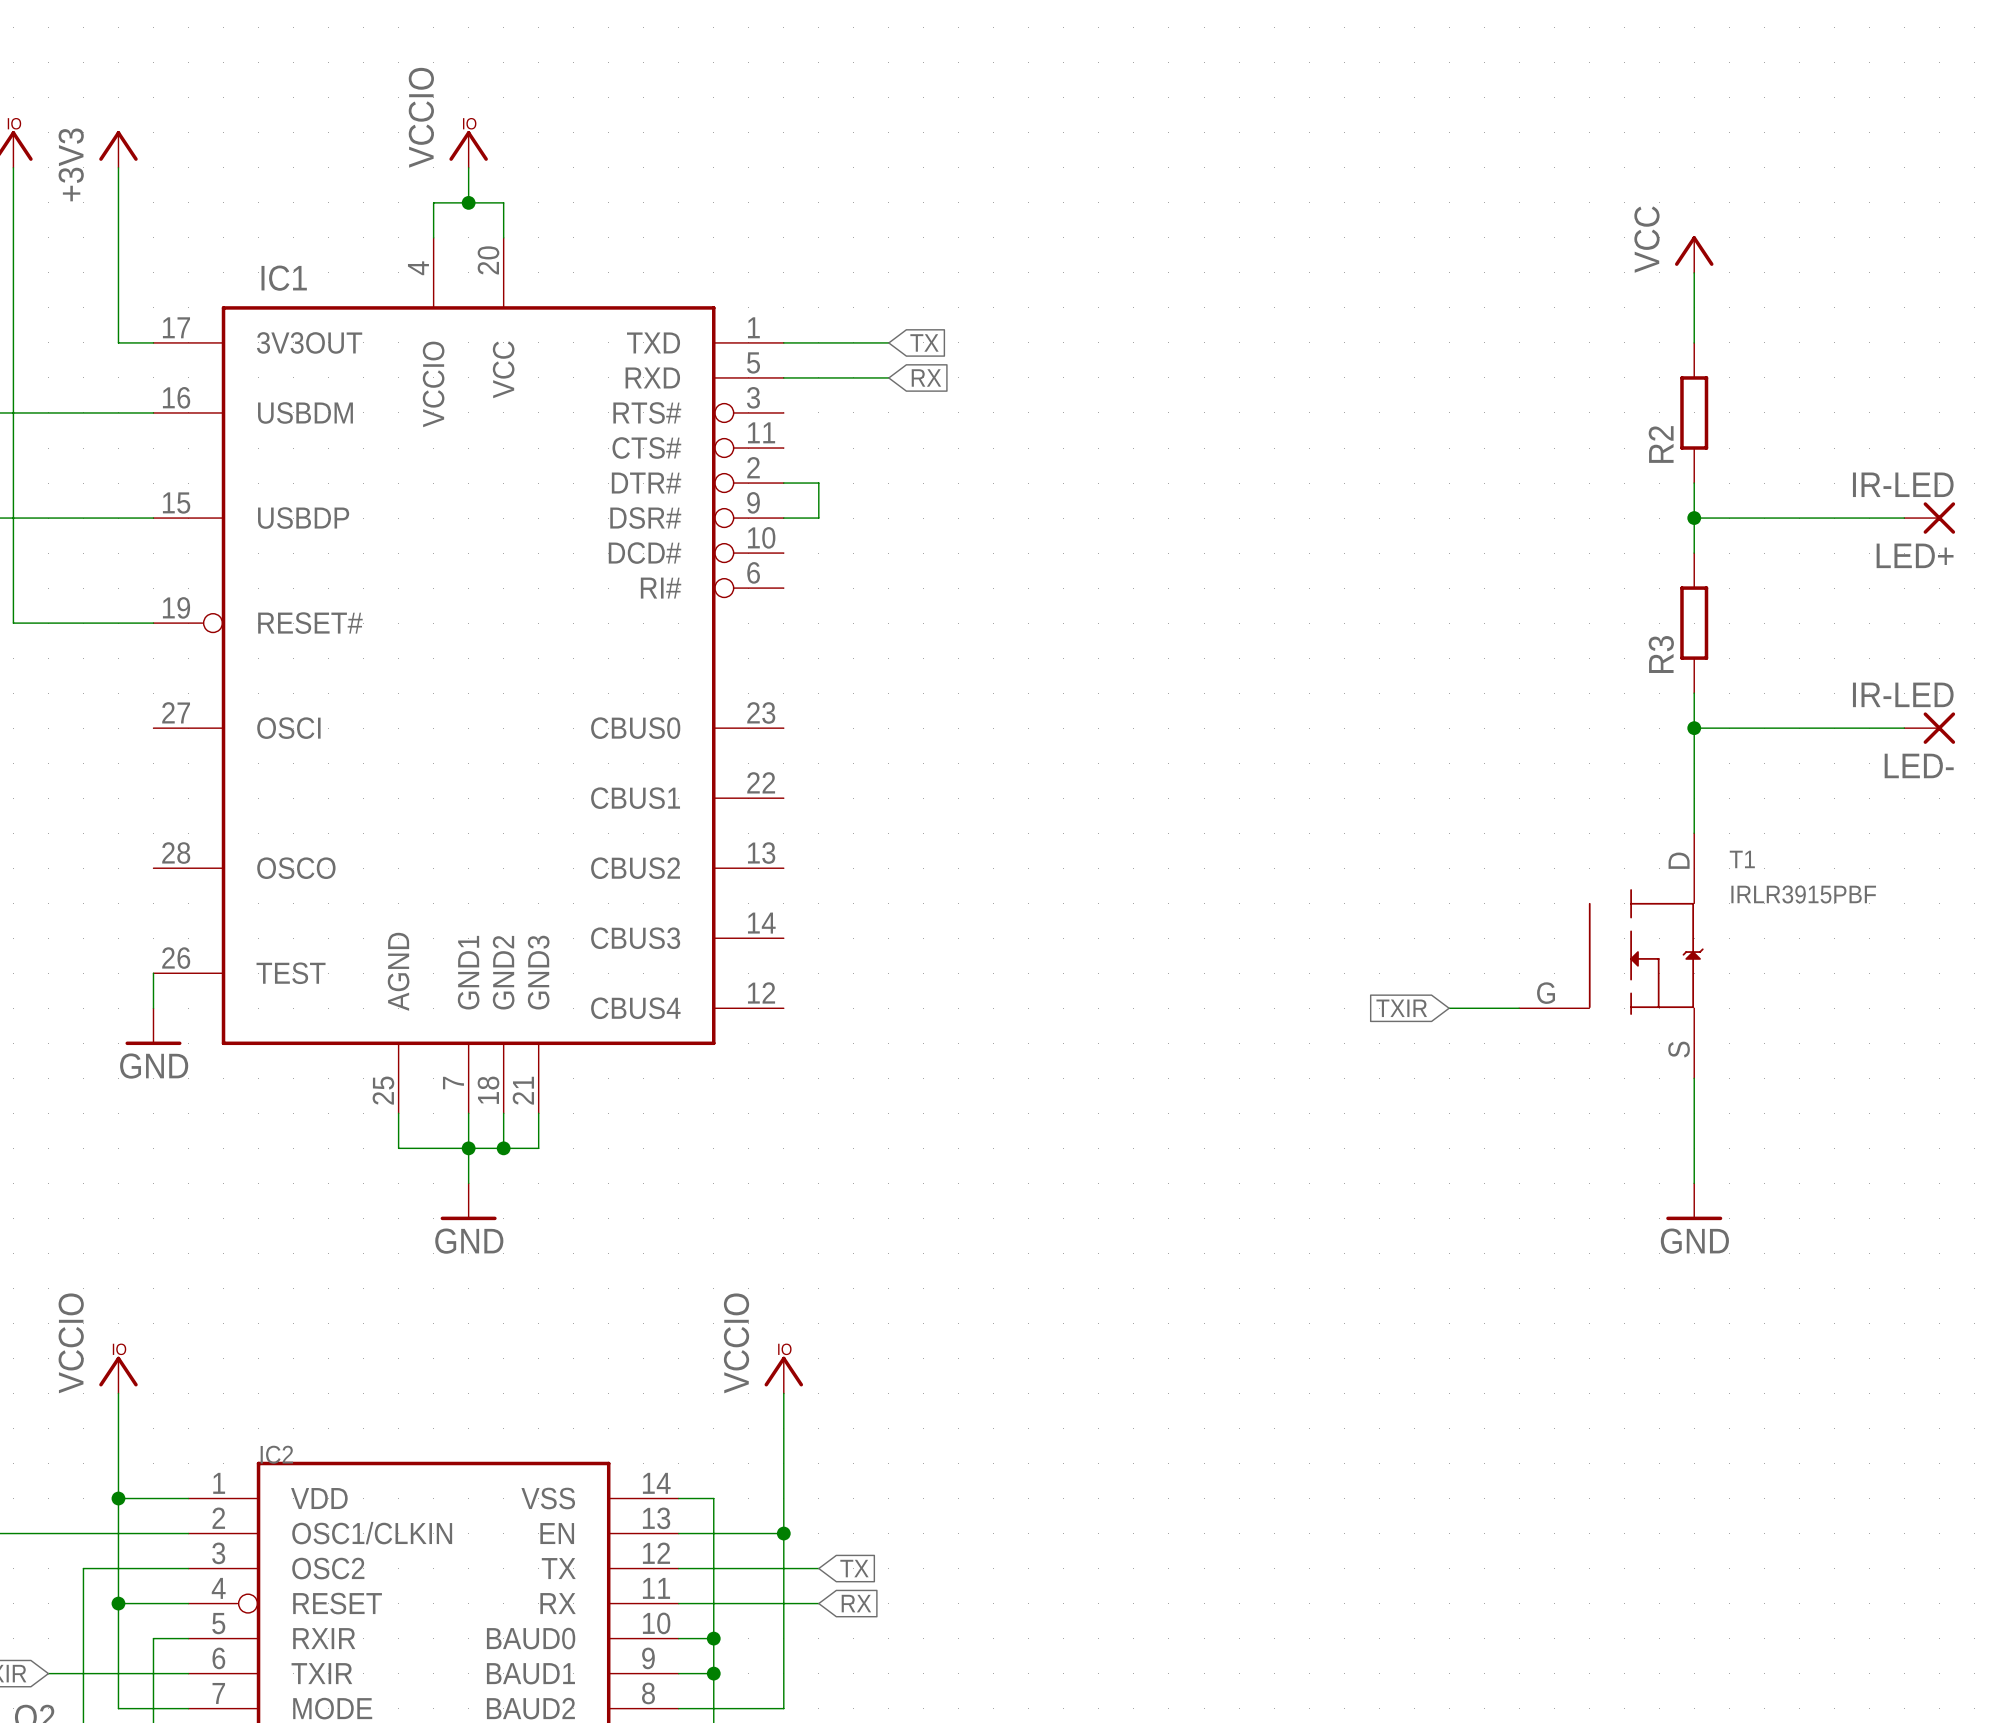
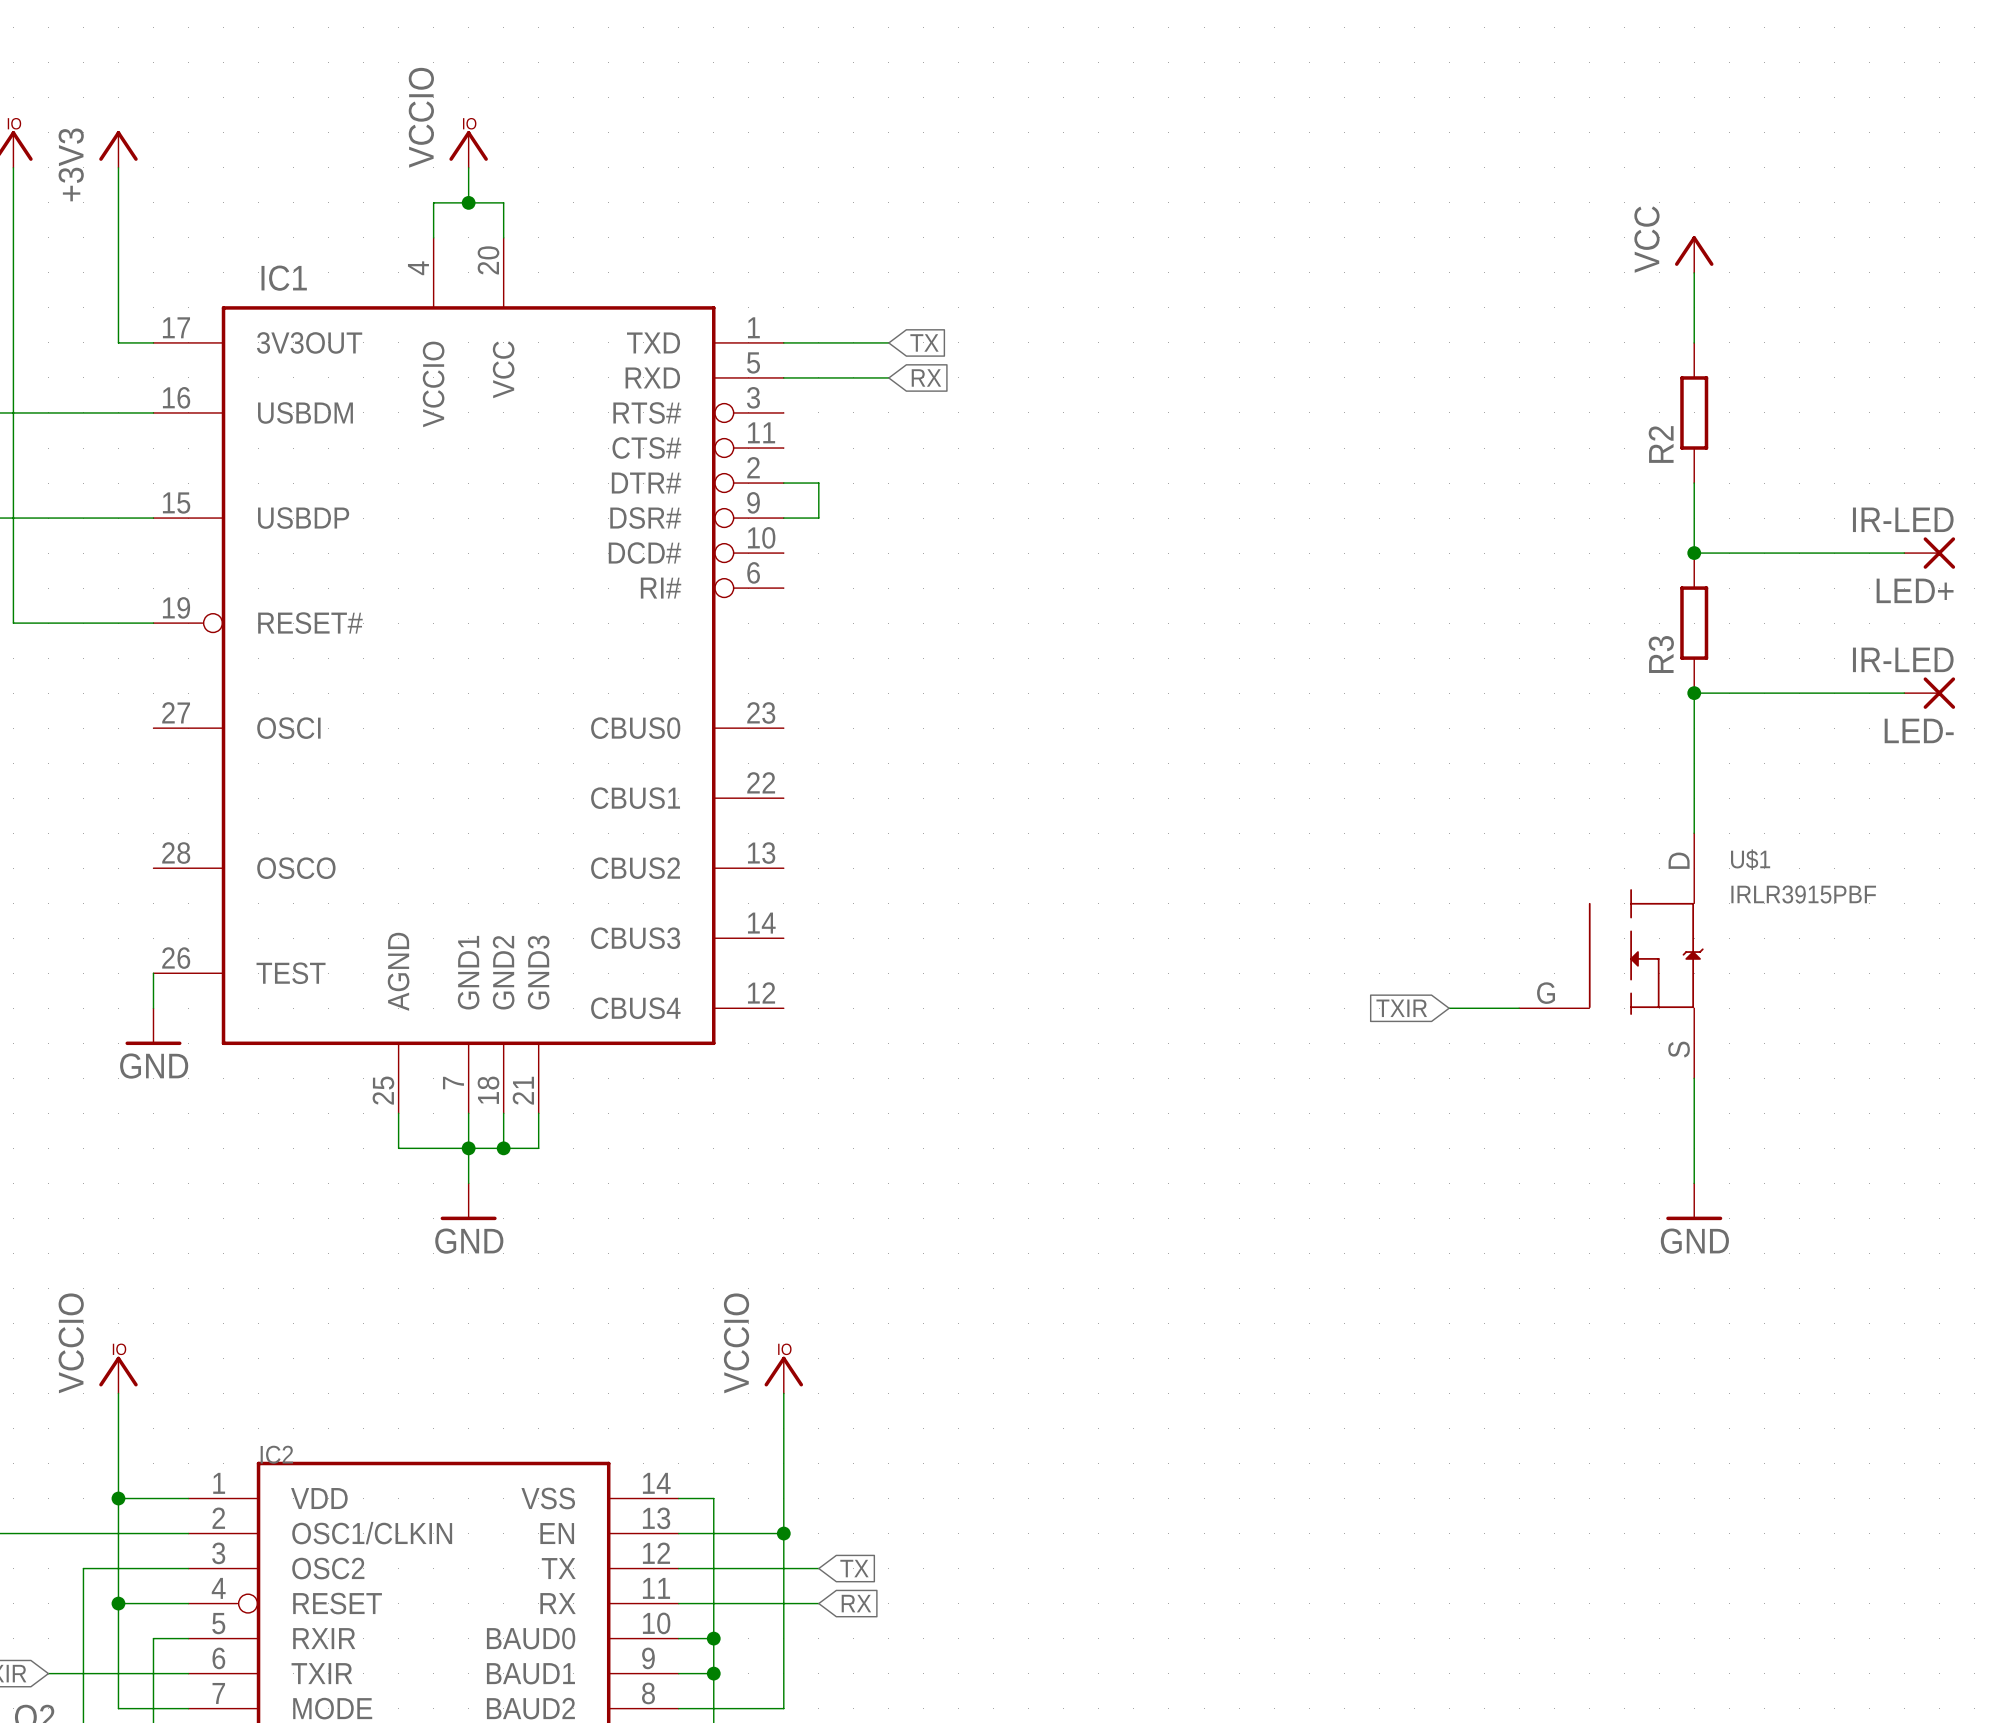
wire: (1694, 518) (1904, 518) -> (1694, 553) (1904, 553)
junction position: (1694, 518) -> (1694, 553)
LED+ position: (1929, 518) -> (1929, 553)
wire: (1694, 728) (1904, 728) -> (1694, 693) (1904, 693)
junction position: (1694, 728) -> (1694, 693)
LED- position: (1929, 728) -> (1929, 693)
T1 name: T1 (1742, 859) -> U$1 (1750, 859)

